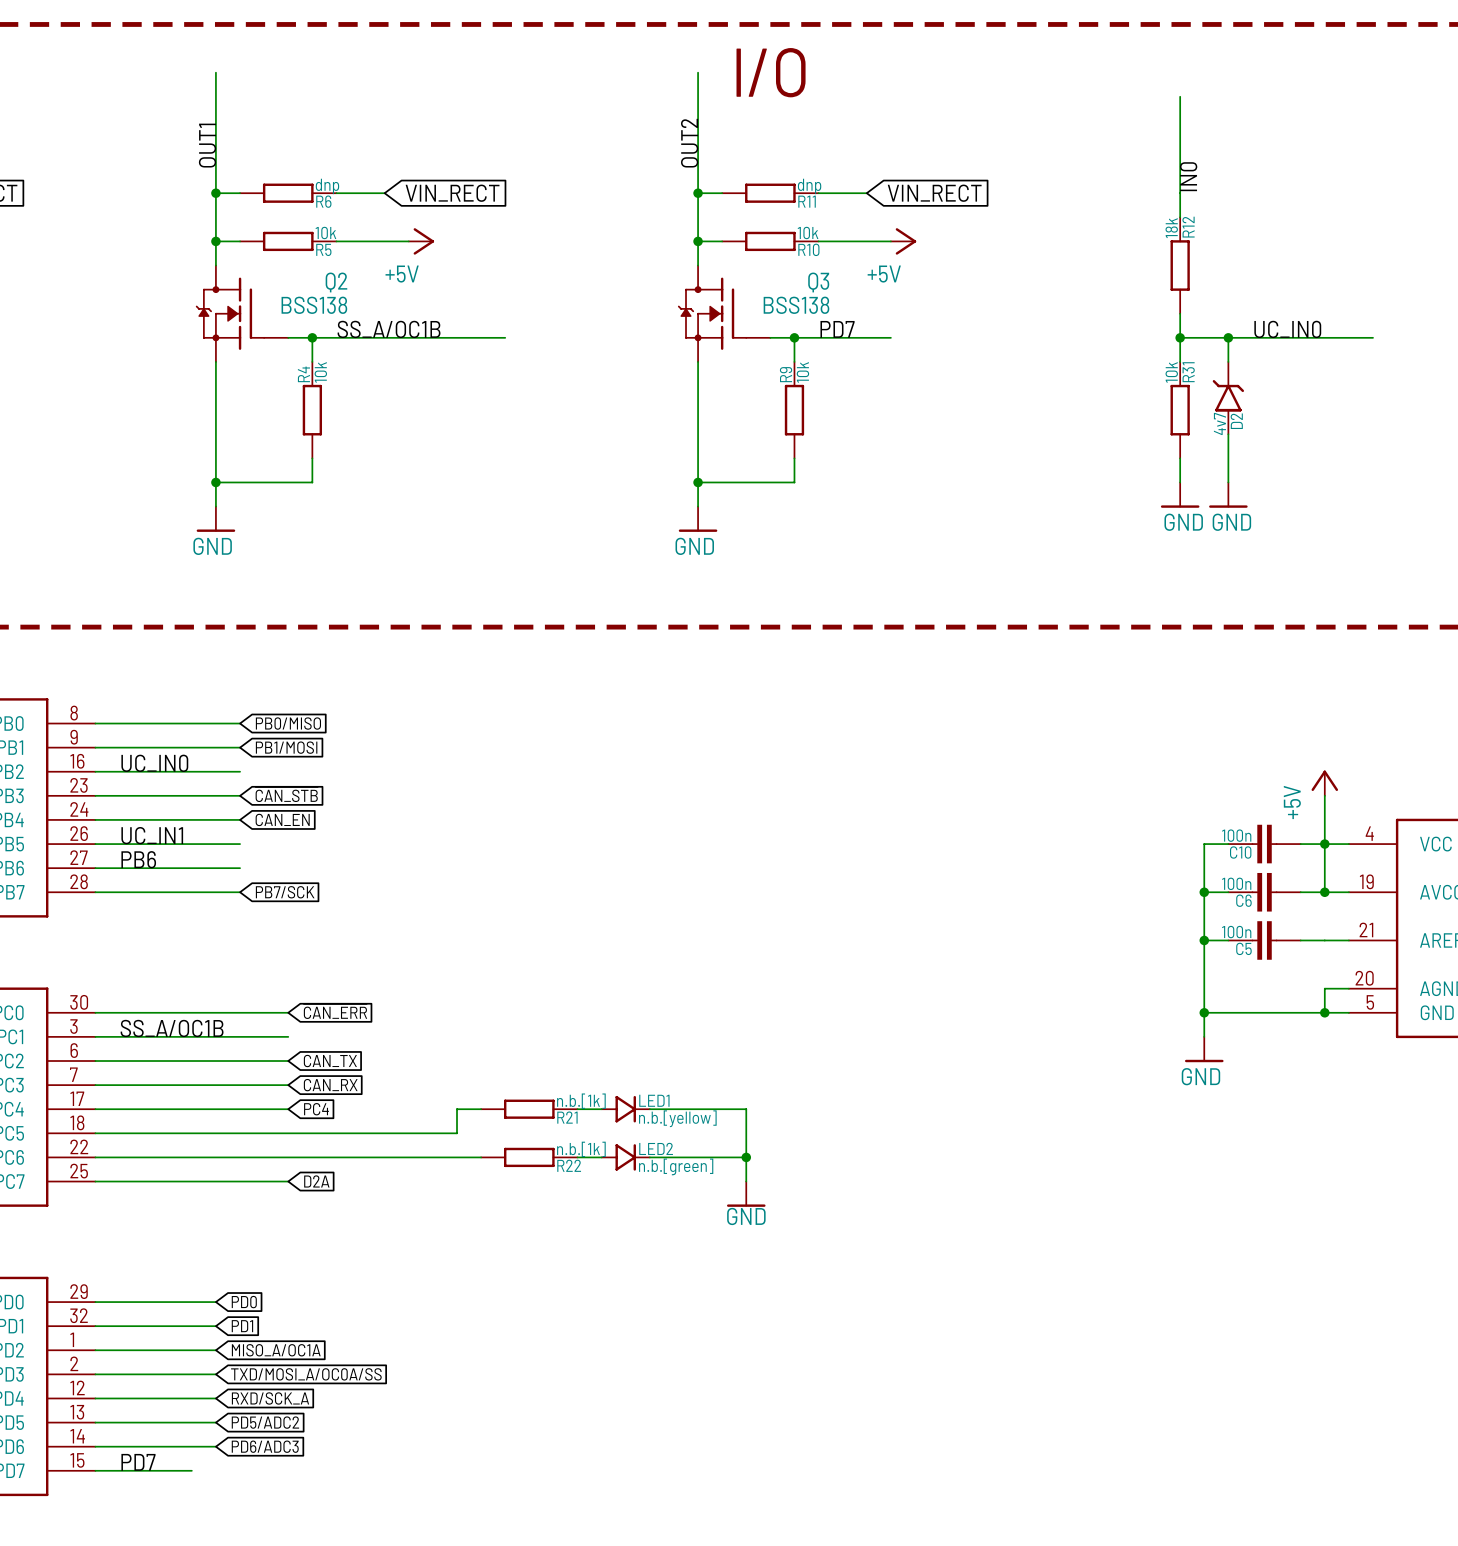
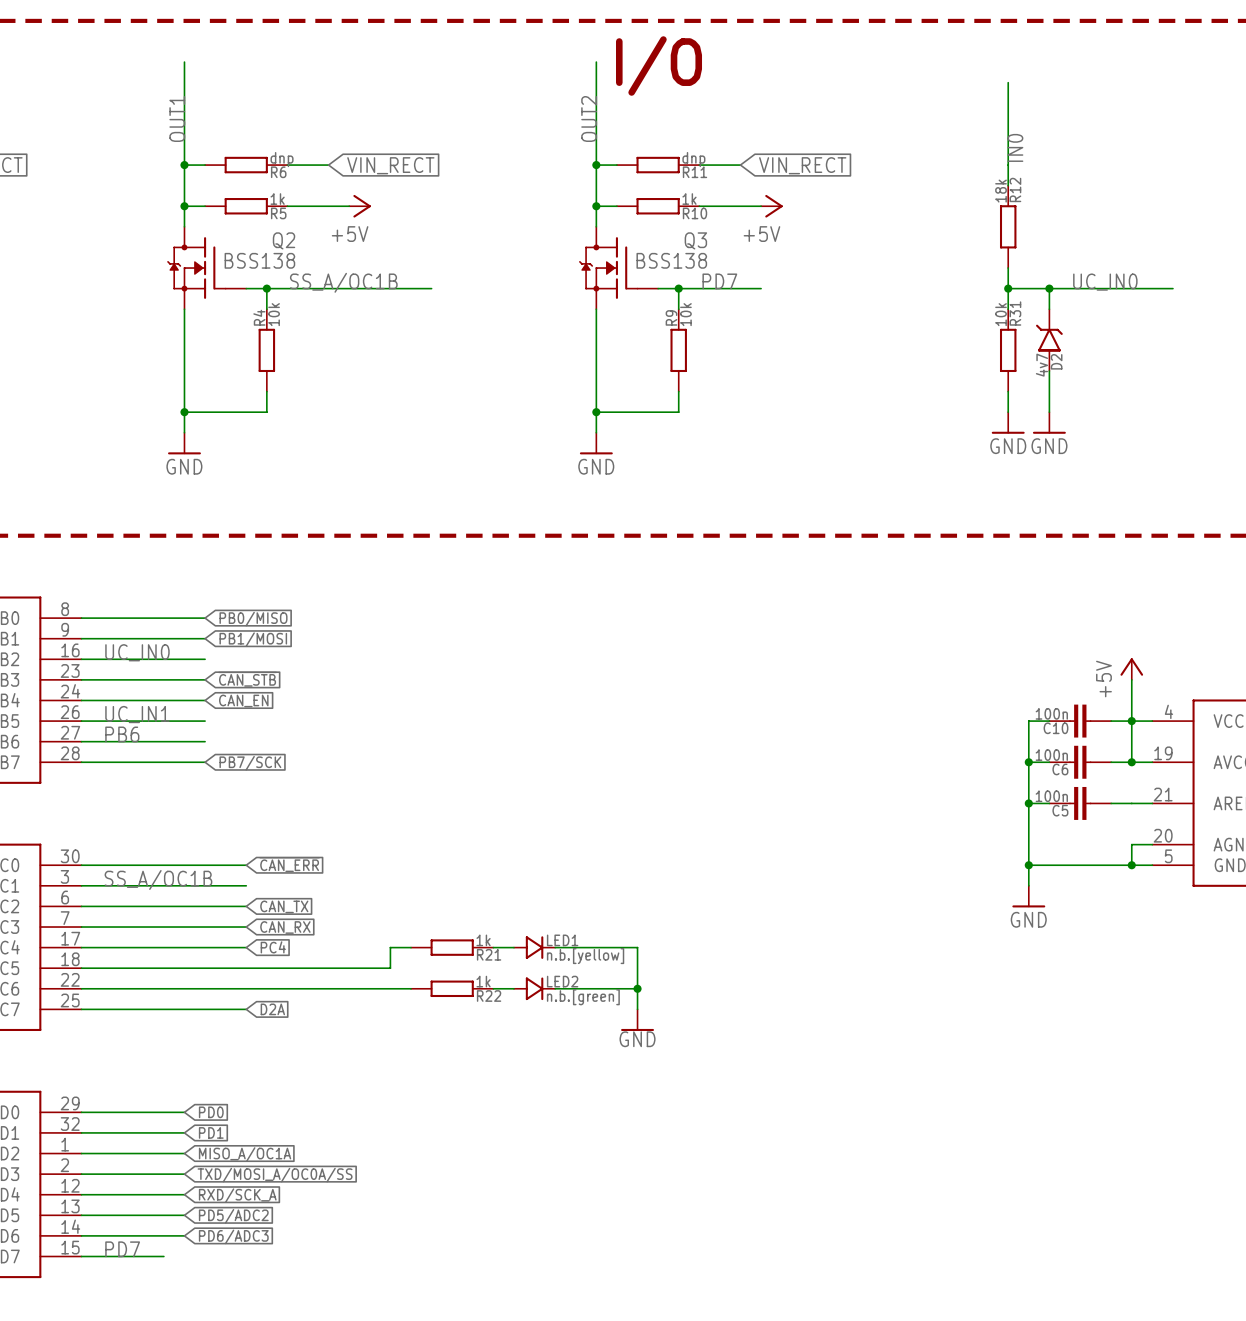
R5 value: 10k (325, 232) -> 1k (277, 199)
R10 value: 10k (808, 232) -> 1k (689, 199)
R21 value: n.b.[1k] (581, 1101) -> 1k (483, 940)
R22 value: n.b.[1k] (581, 1149) -> 1k (483, 981)

